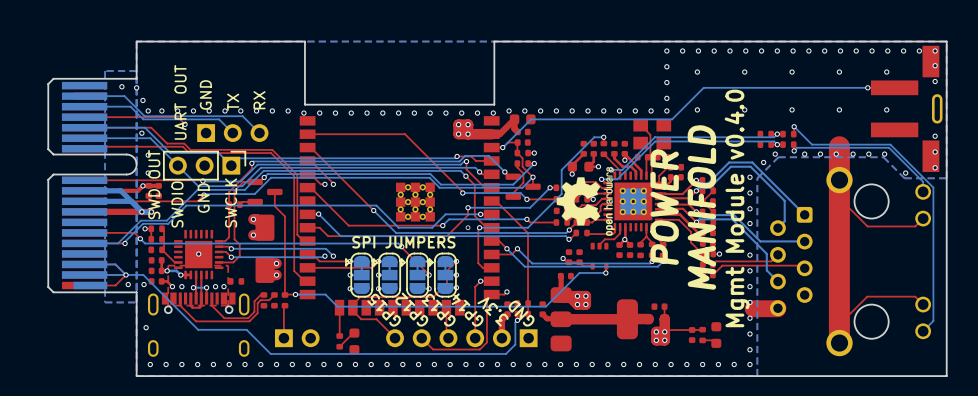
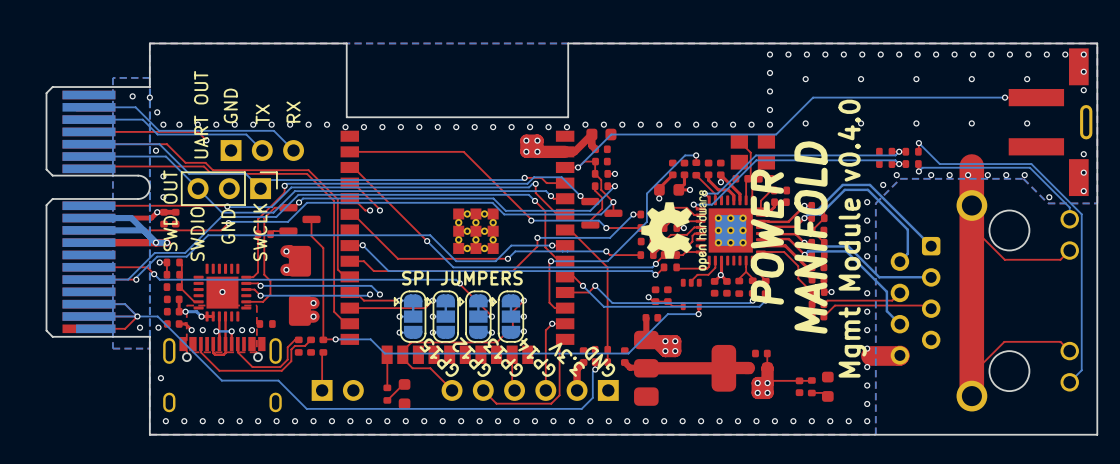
via: (468, 227) -> none
top track: (506, 291) (504, 294) (491, 294) -> none
via: (506, 291) -> none

